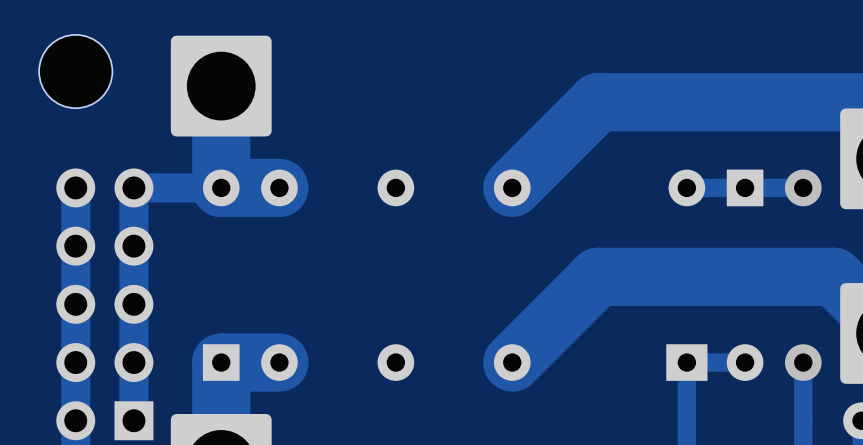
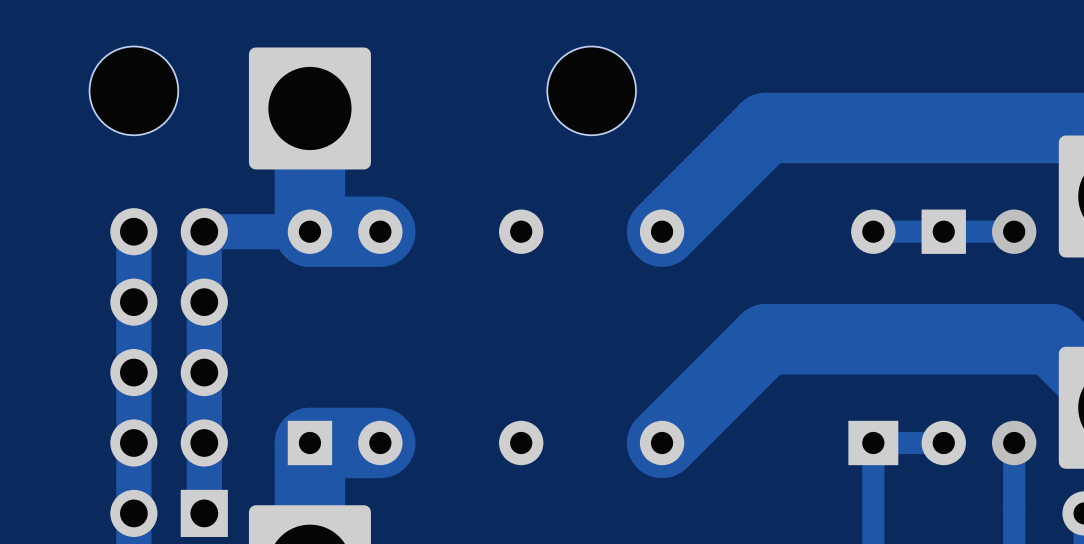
part: none -> (591, 90)

